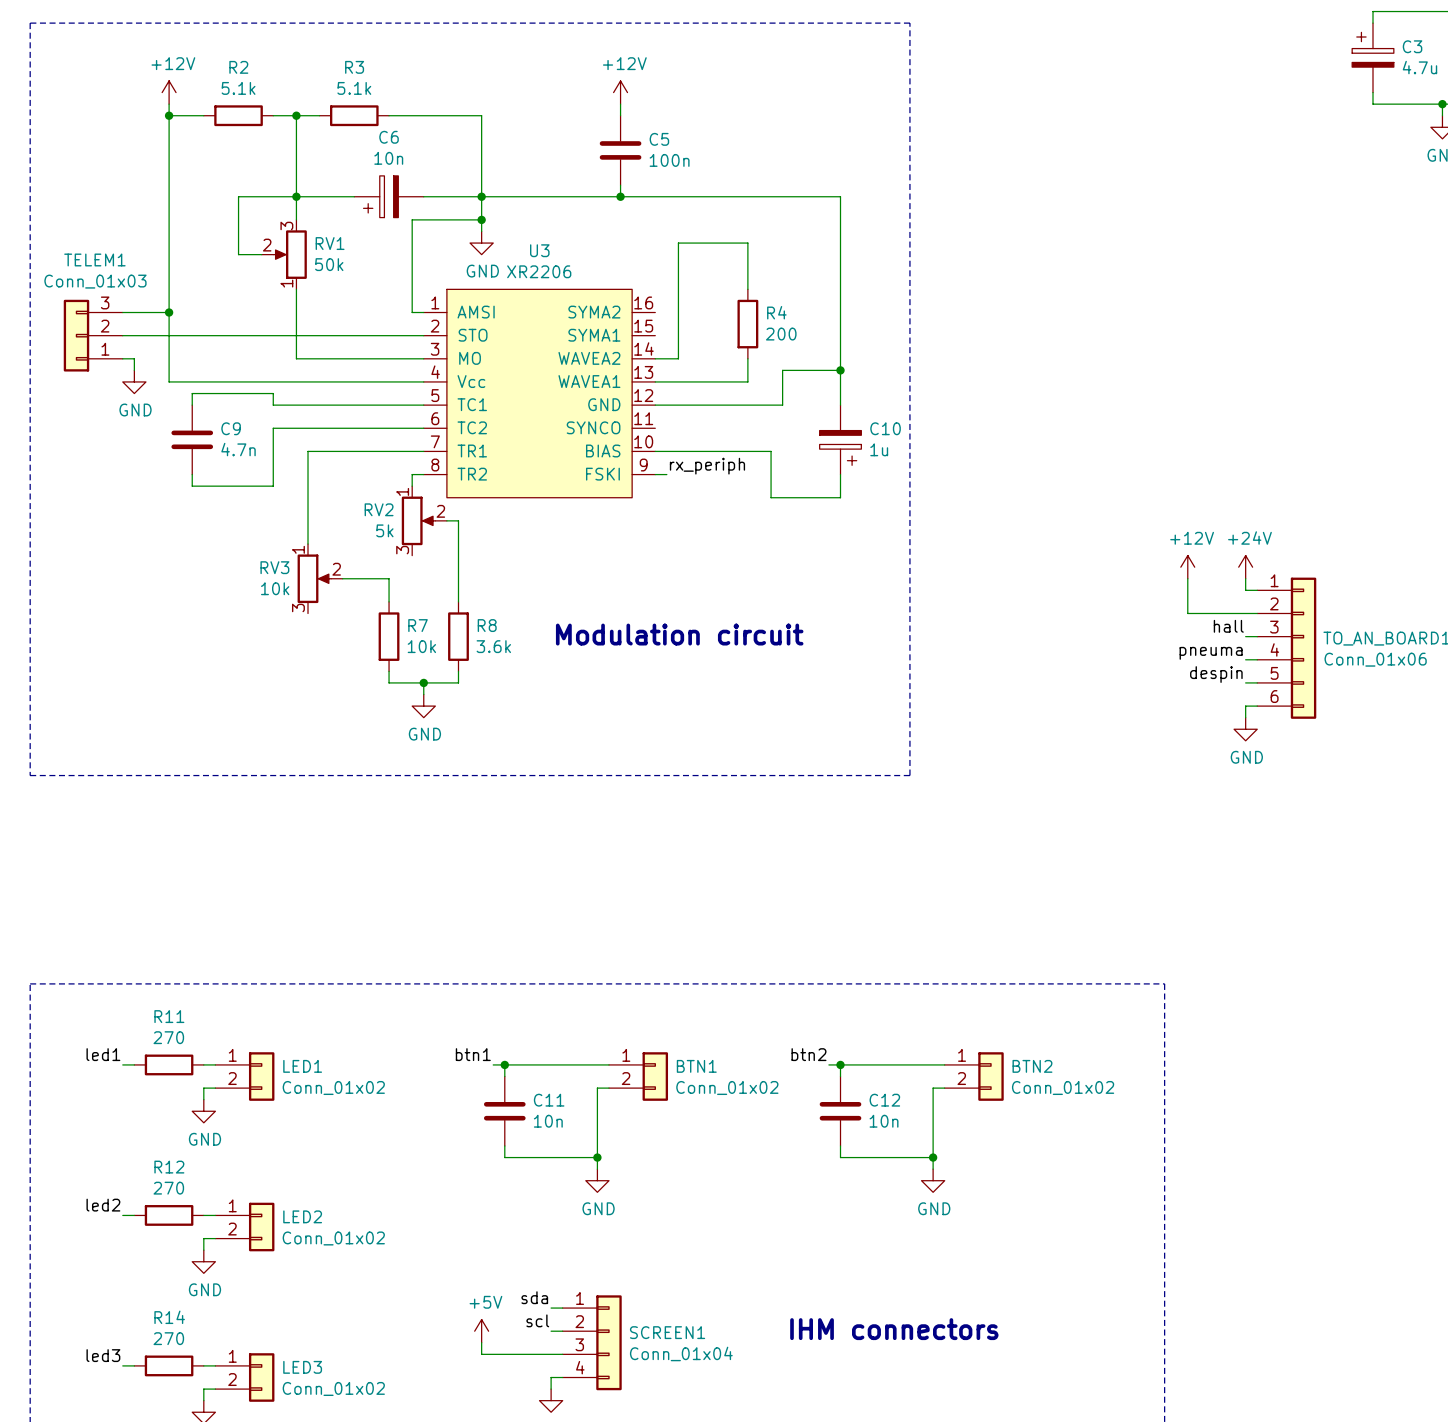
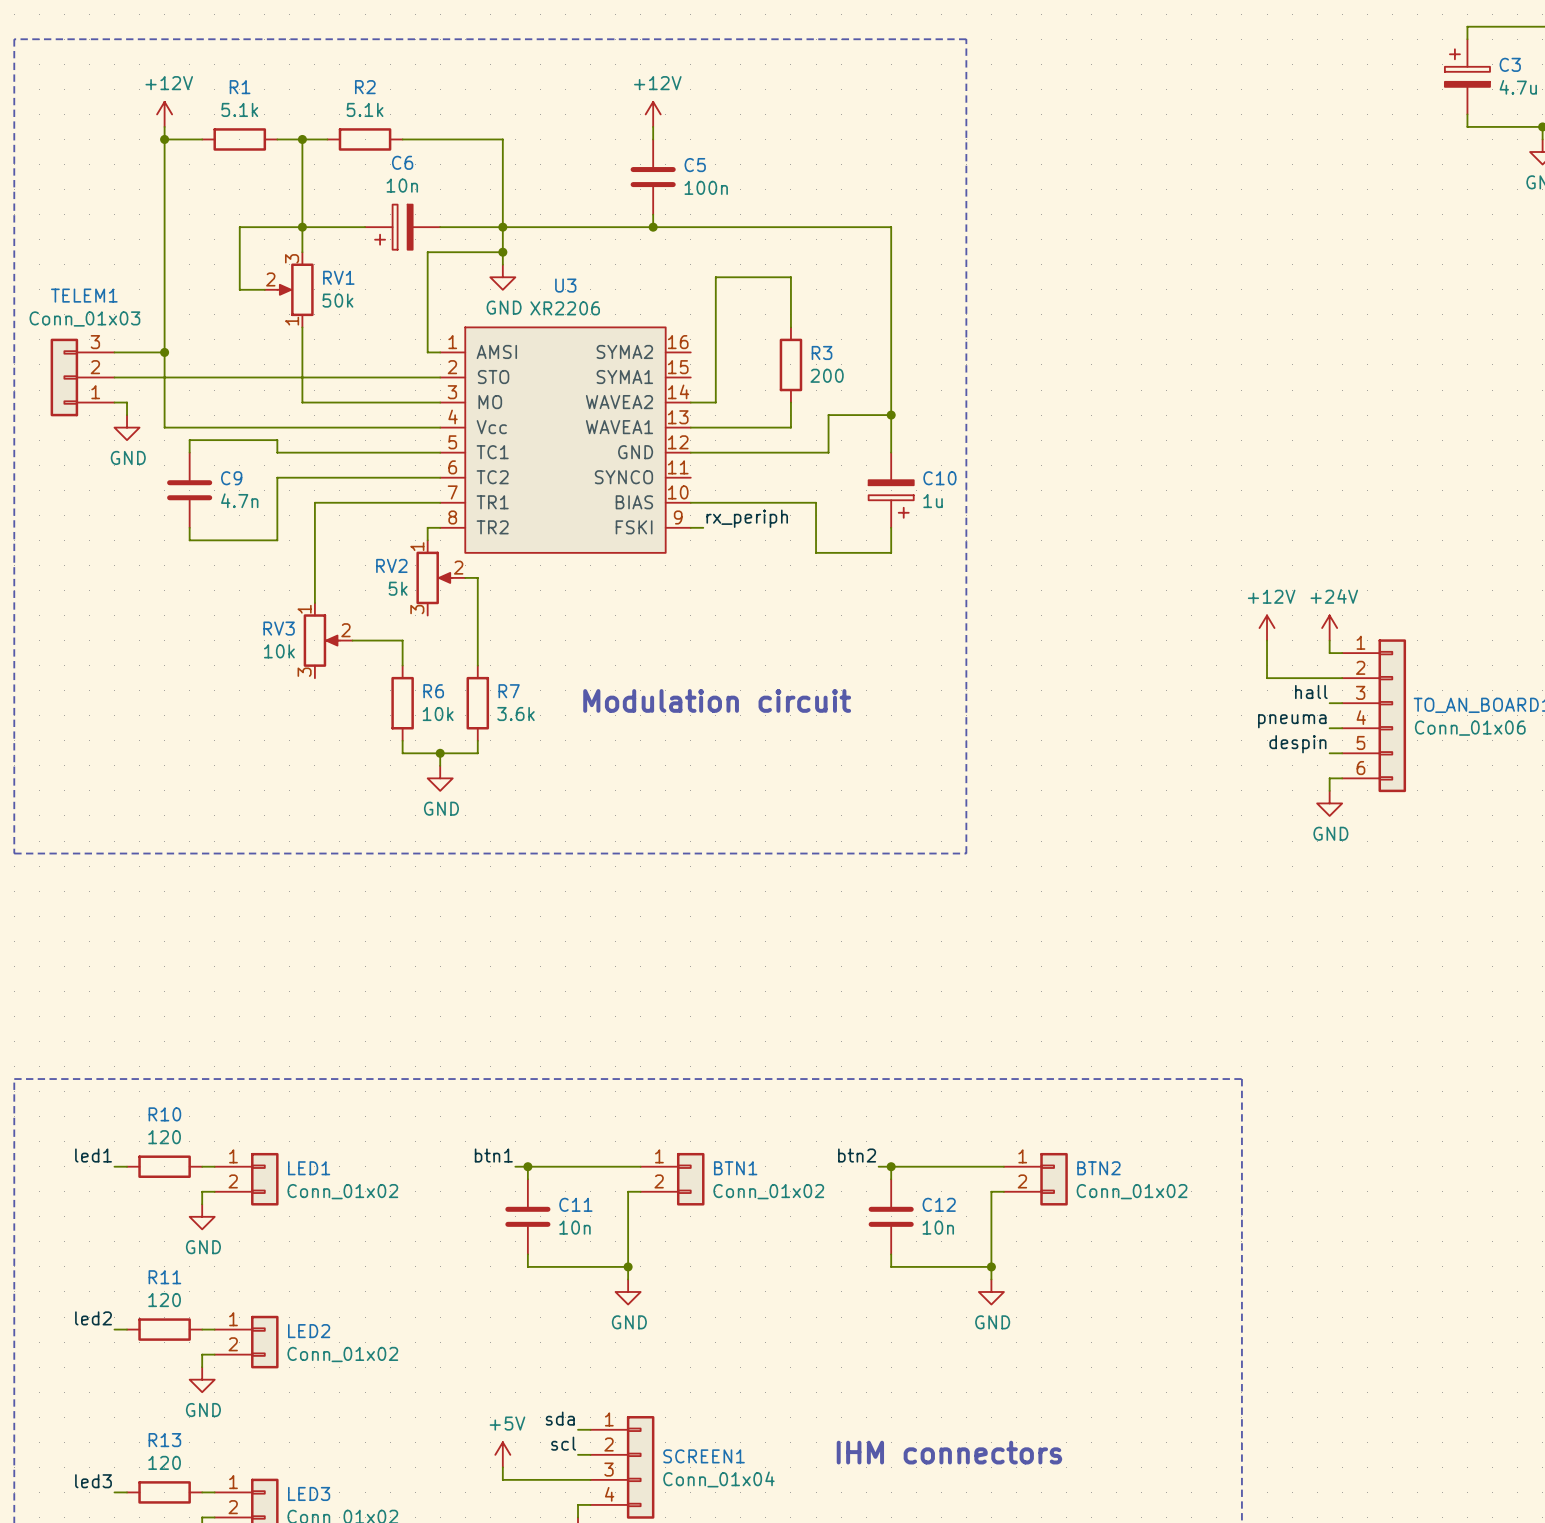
R2 name: R2 (238, 67) -> R1 (240, 87)
R3 name: R3 (354, 67) -> R2 (365, 87)
R4 name: R4 (776, 312) -> R3 (822, 352)
R7 name: R7 (418, 625) -> R6 (433, 691)
R8 name: R8 (487, 625) -> R7 (509, 691)
R11 name: R11 (169, 1016) -> R10 (164, 1114)
R11 value: 270 (168, 1037) -> 120 (164, 1137)
R12 name: R12 (169, 1167) -> R11 (164, 1277)
R12 value: 270 (168, 1188) -> 120 (164, 1300)
R14 name: R14 (169, 1317) -> R13 (164, 1440)
R14 value: 270 (168, 1338) -> 120 (164, 1462)

